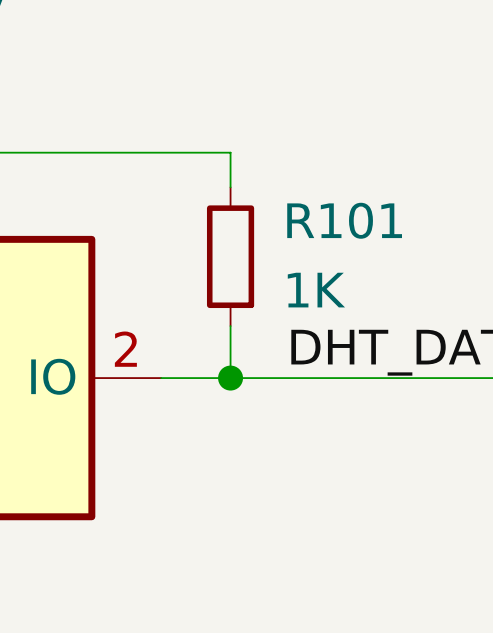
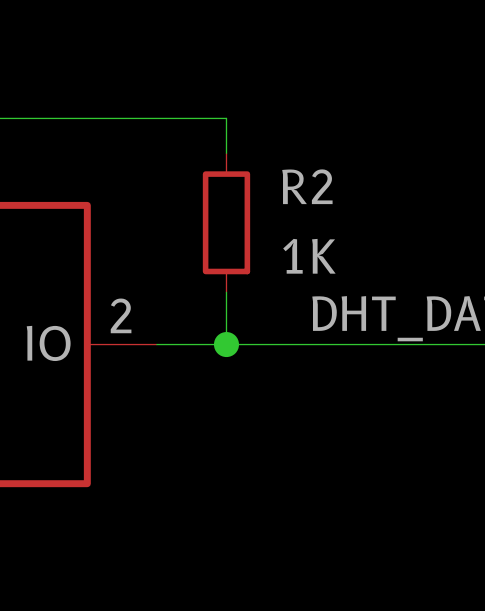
R101 name: R101 (344, 220) -> R2 (307, 186)

